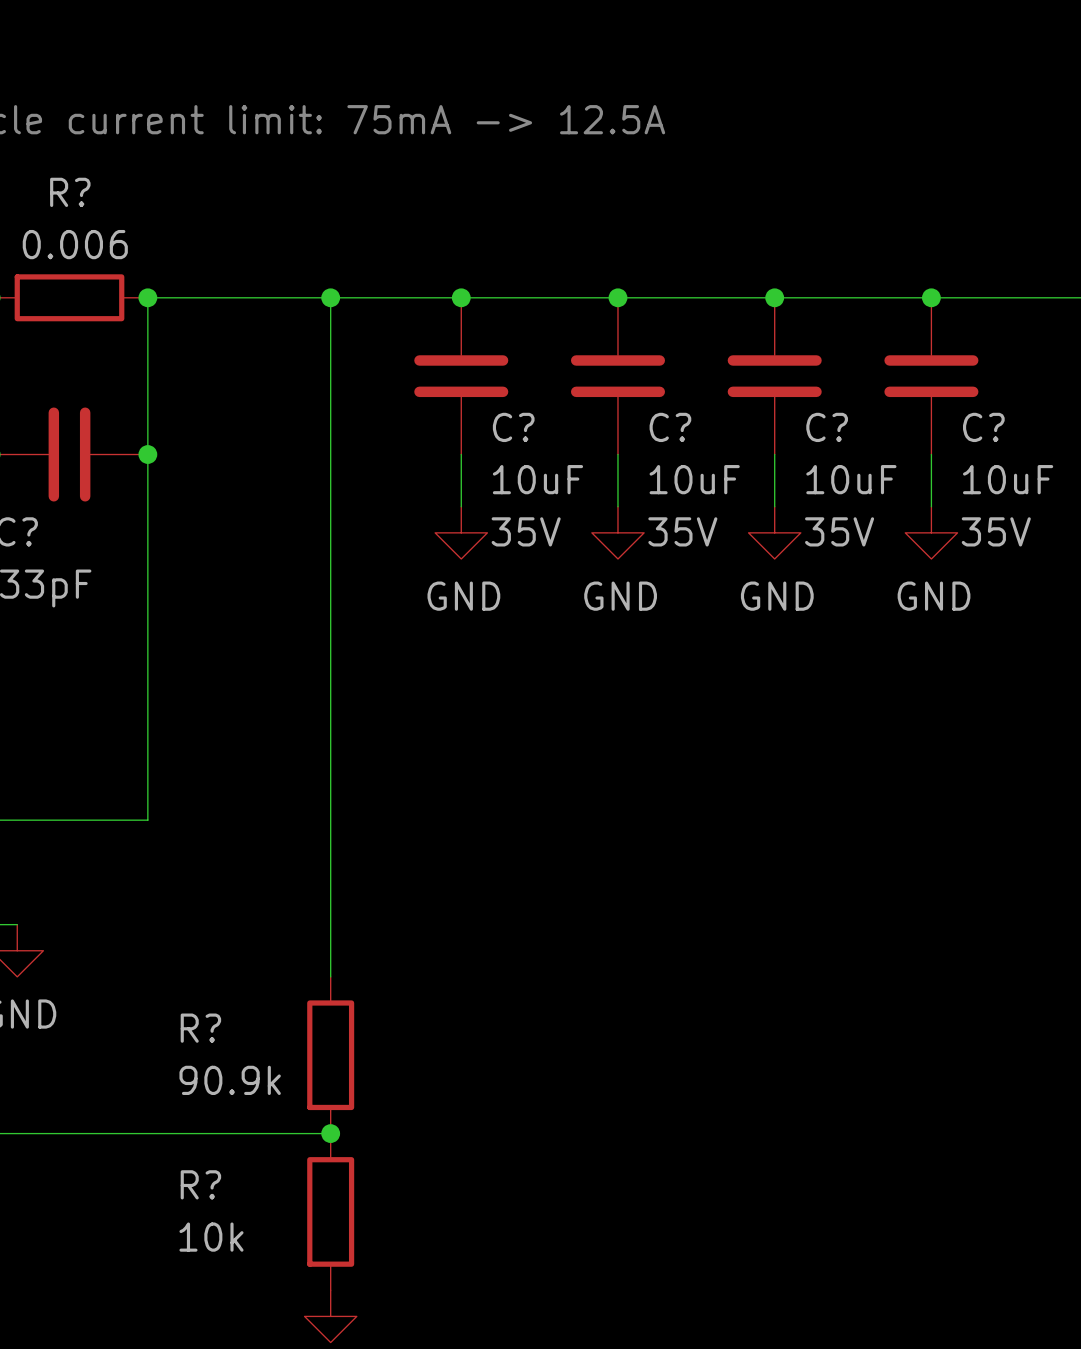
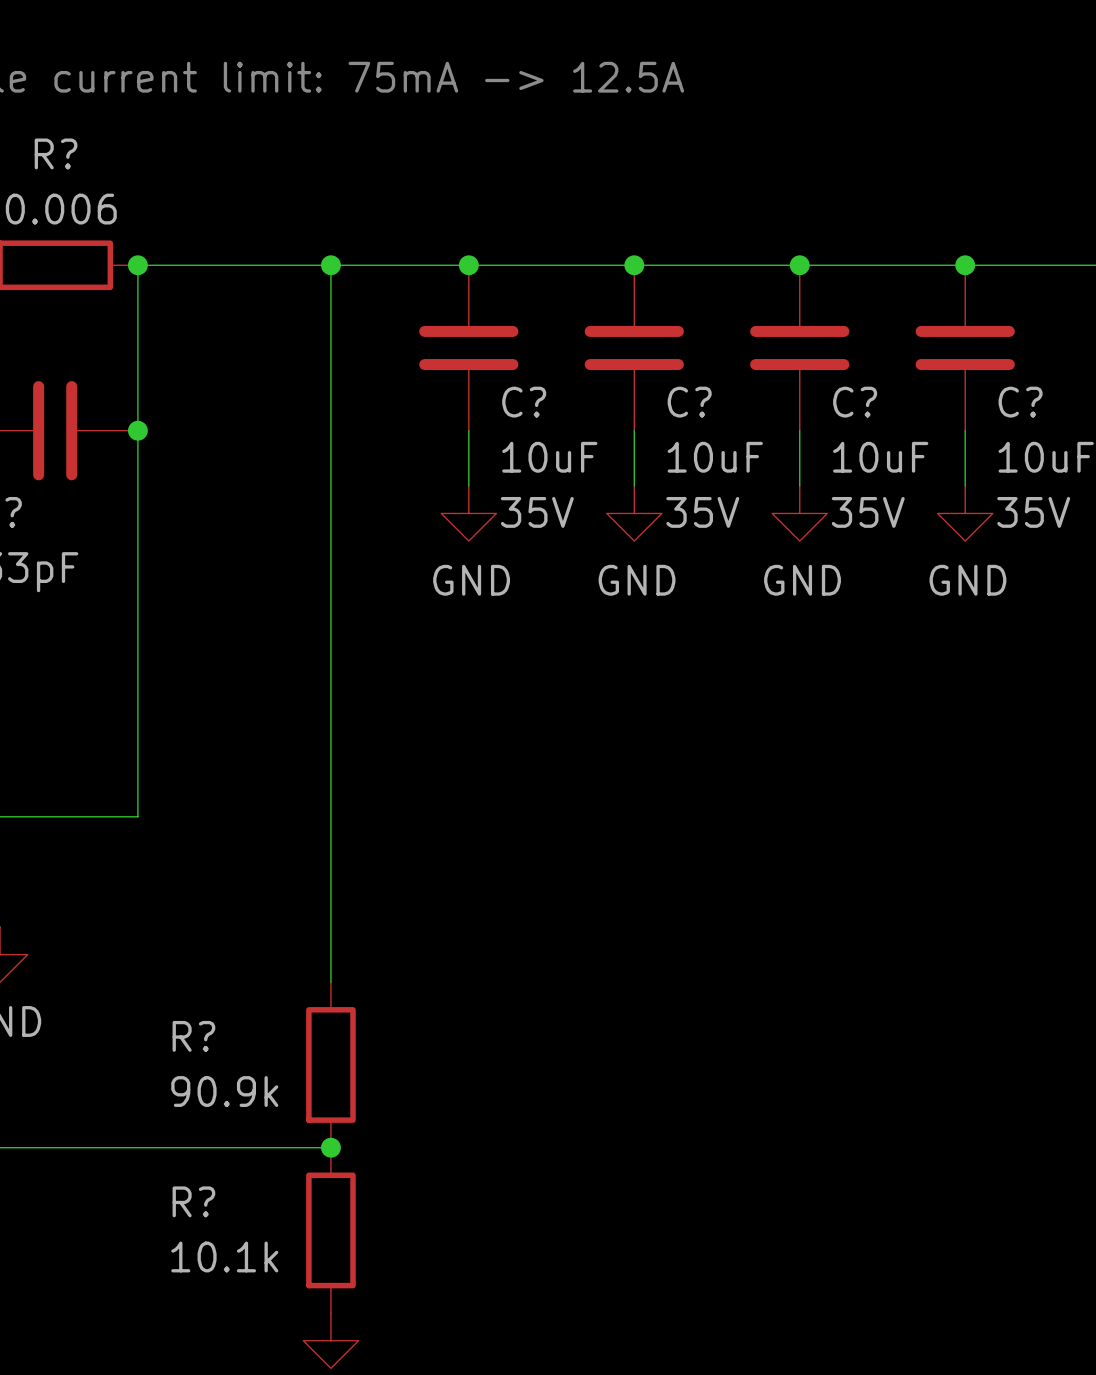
R? value: 10k (211, 1237) -> 10.1k (224, 1256)

